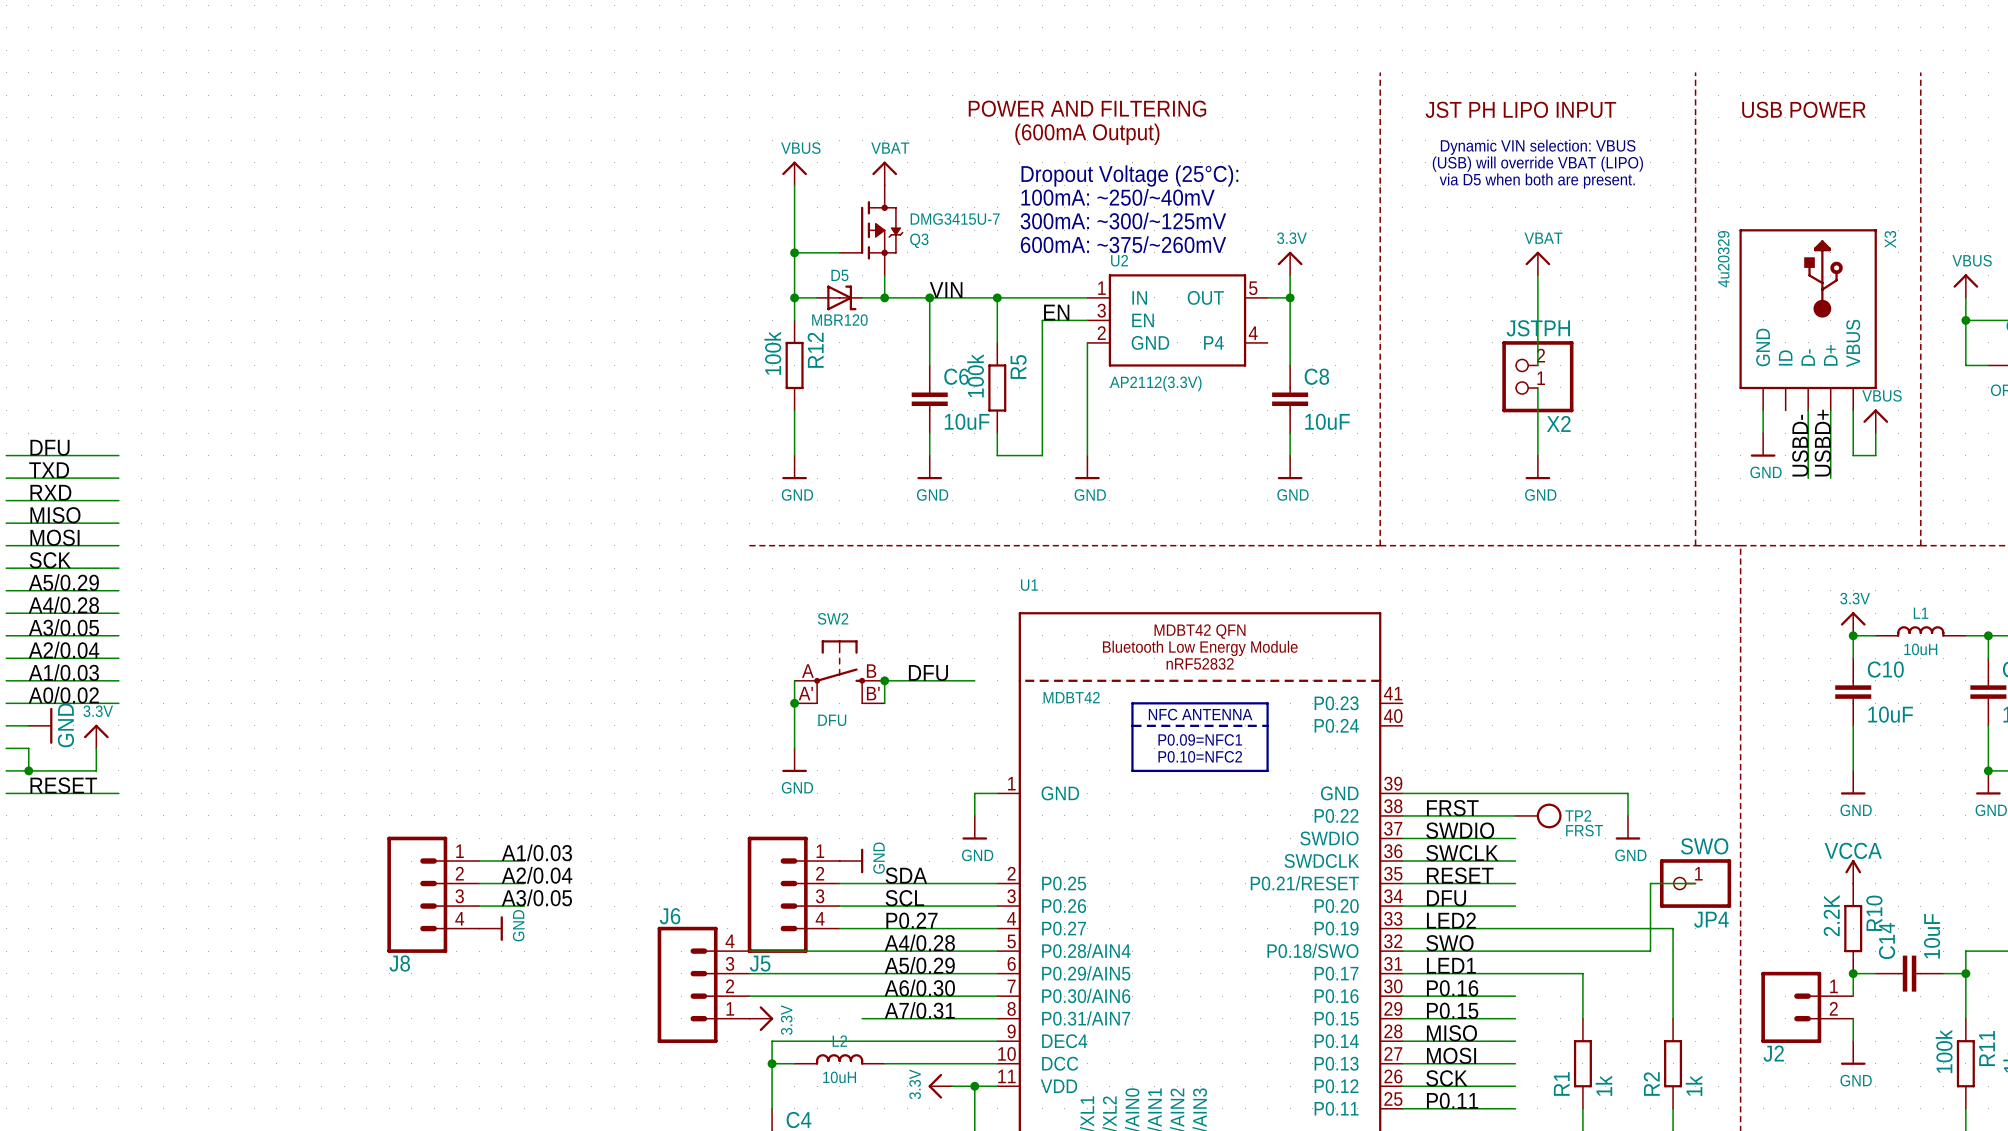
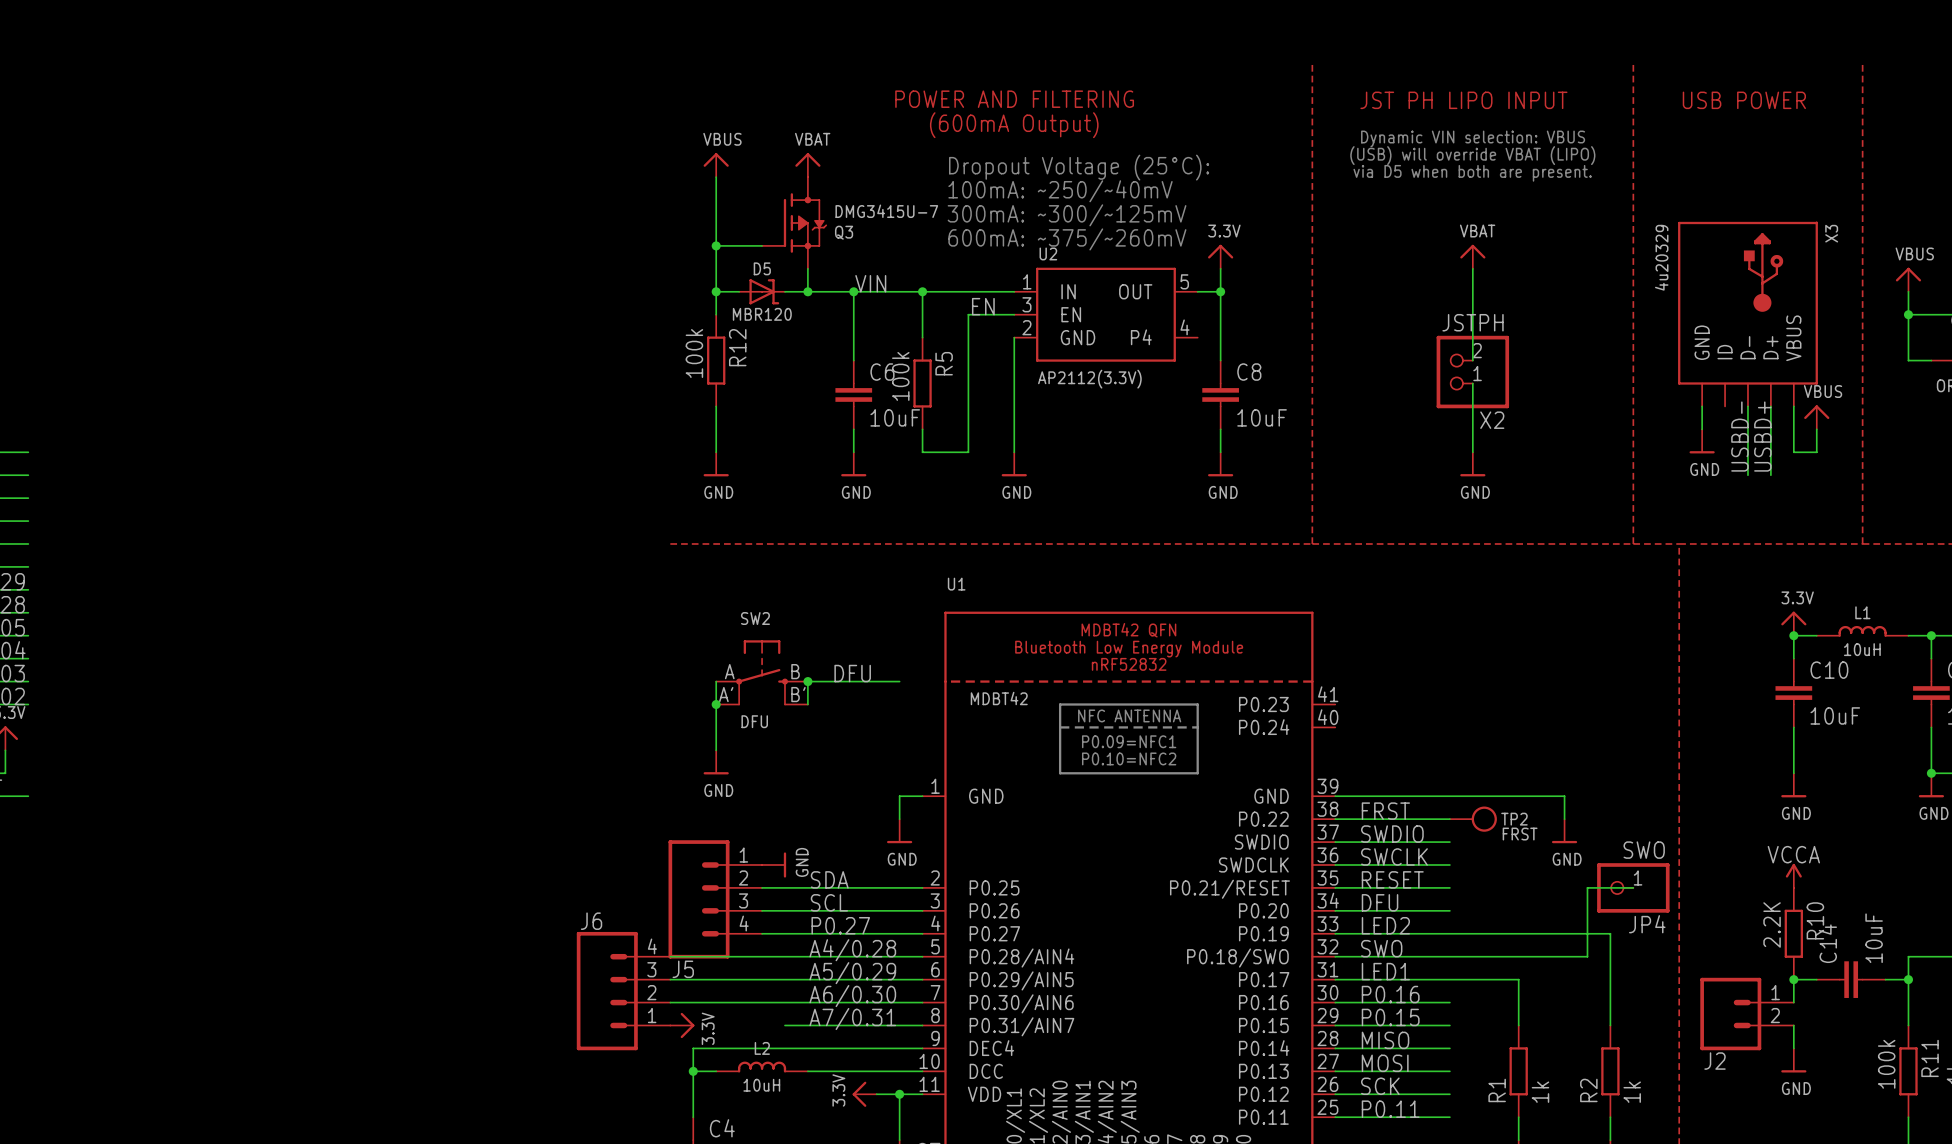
label: A1/0.03 (536, 852) -> none
wire: (479, 861) (524, 861) -> none
label: A2/0.04 (537, 875) -> none
wire: (479, 883) (524, 883) -> none
J8: (433, 894) -> none
label: A3/0.05 (536, 897) -> none
wire: (479, 906) (524, 906) -> none
power symbol: GND (491, 928) -> none

